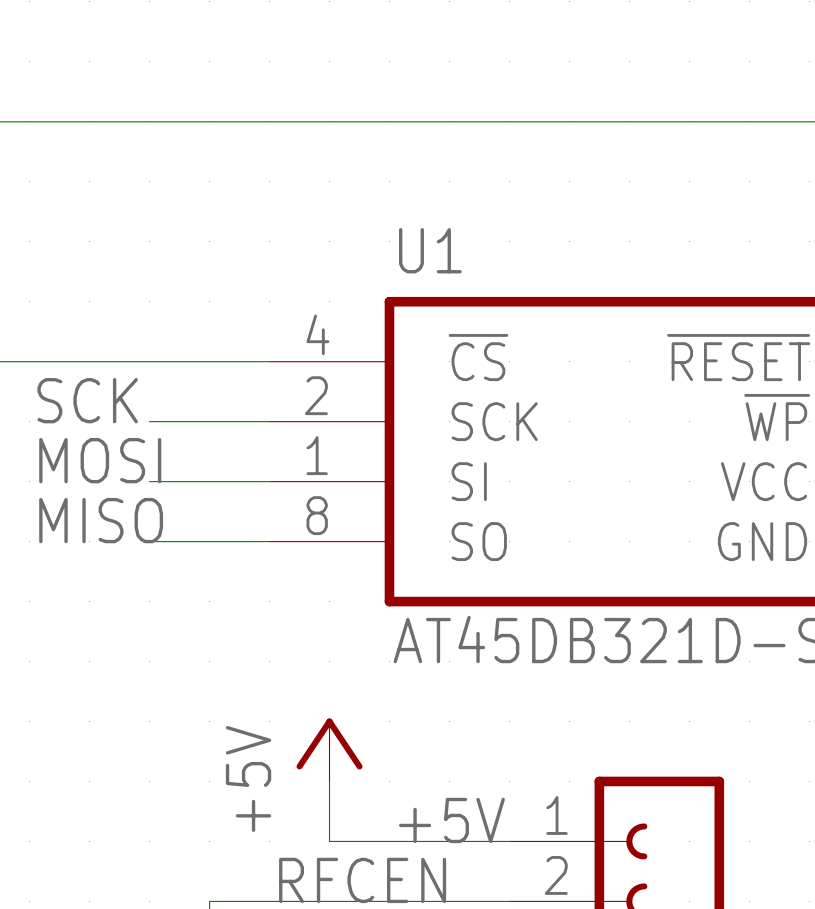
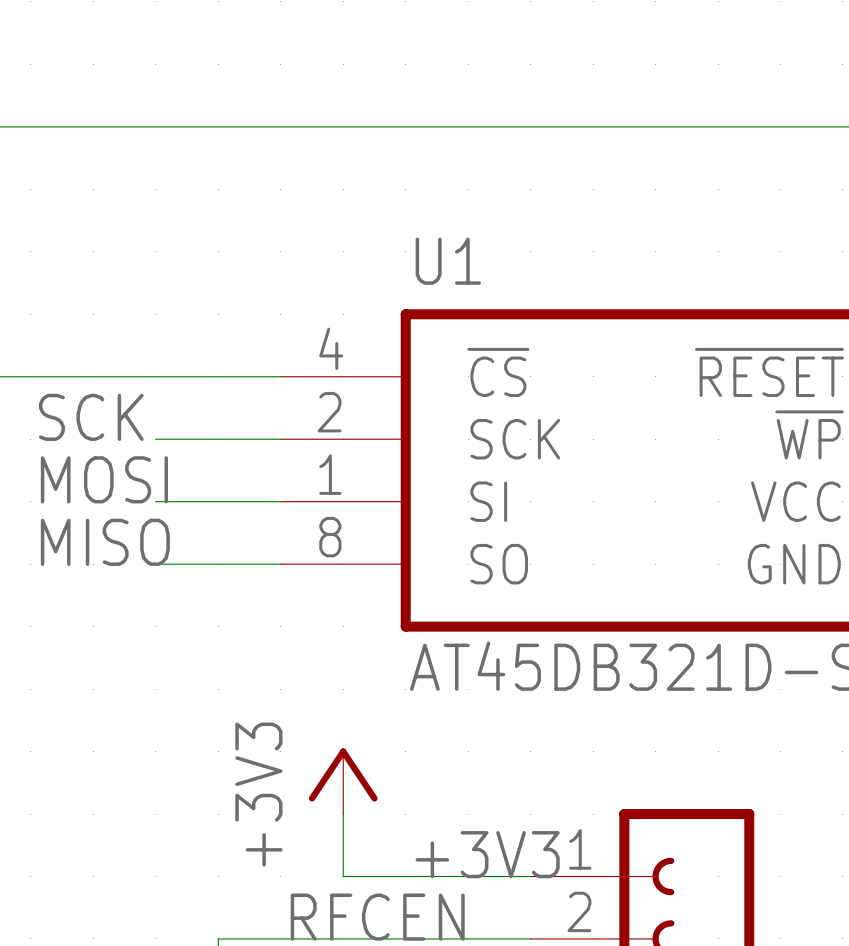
power symbol: +5V (329, 749) -> +3V3 (343, 781)
label: +5V (451, 820) -> +3V3 (487, 854)

